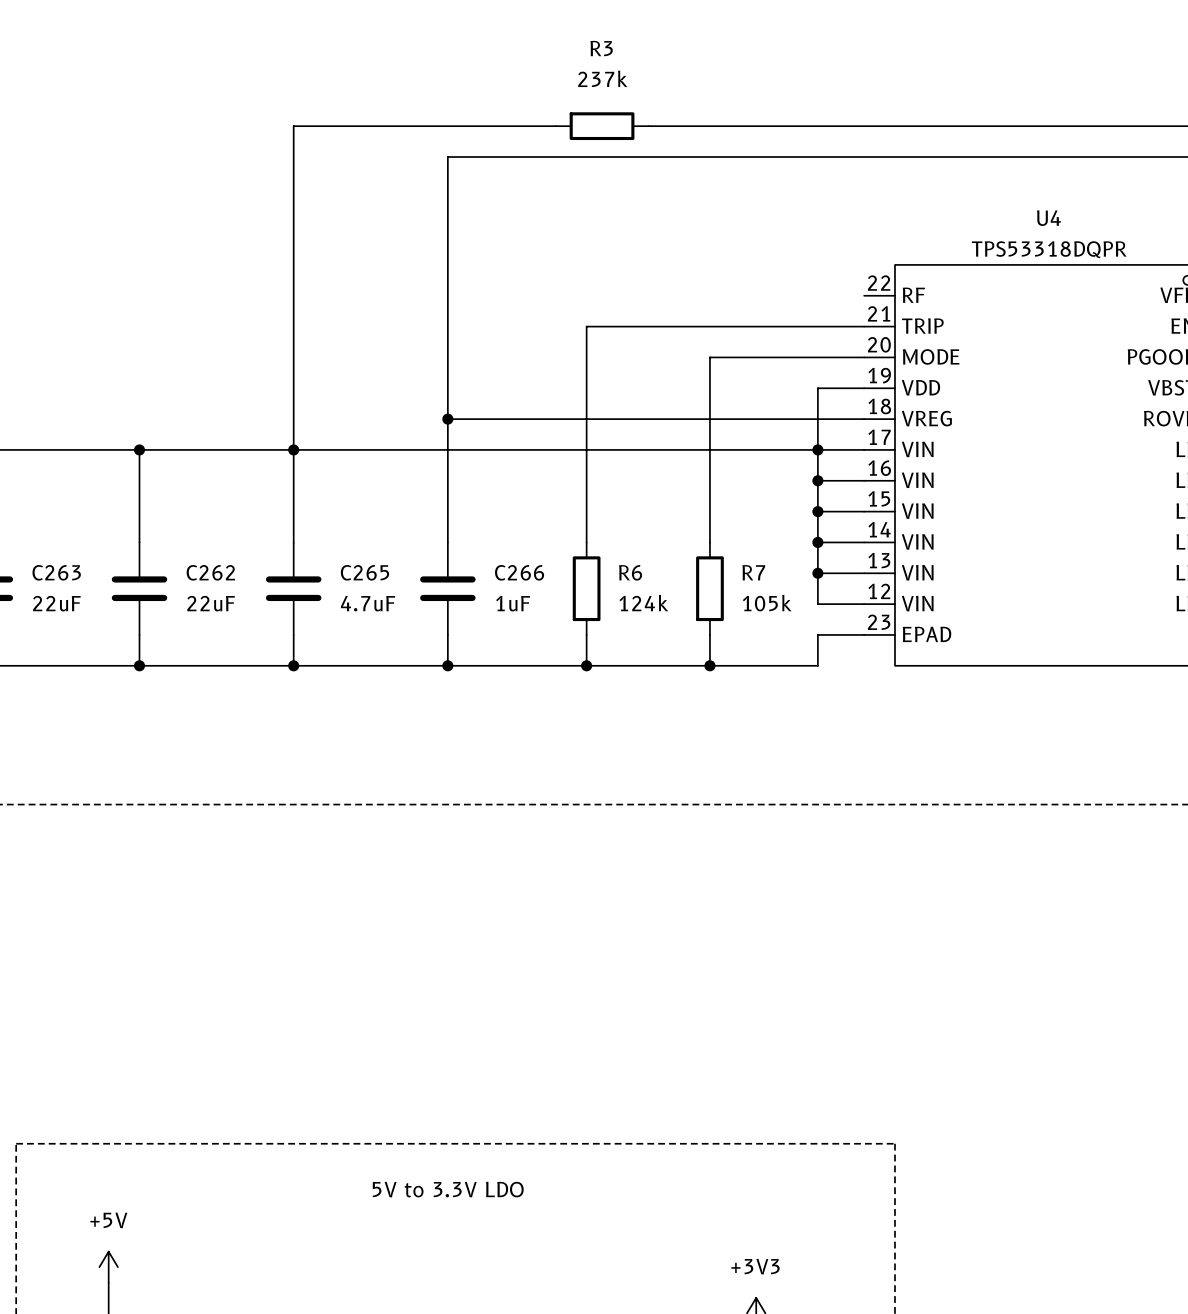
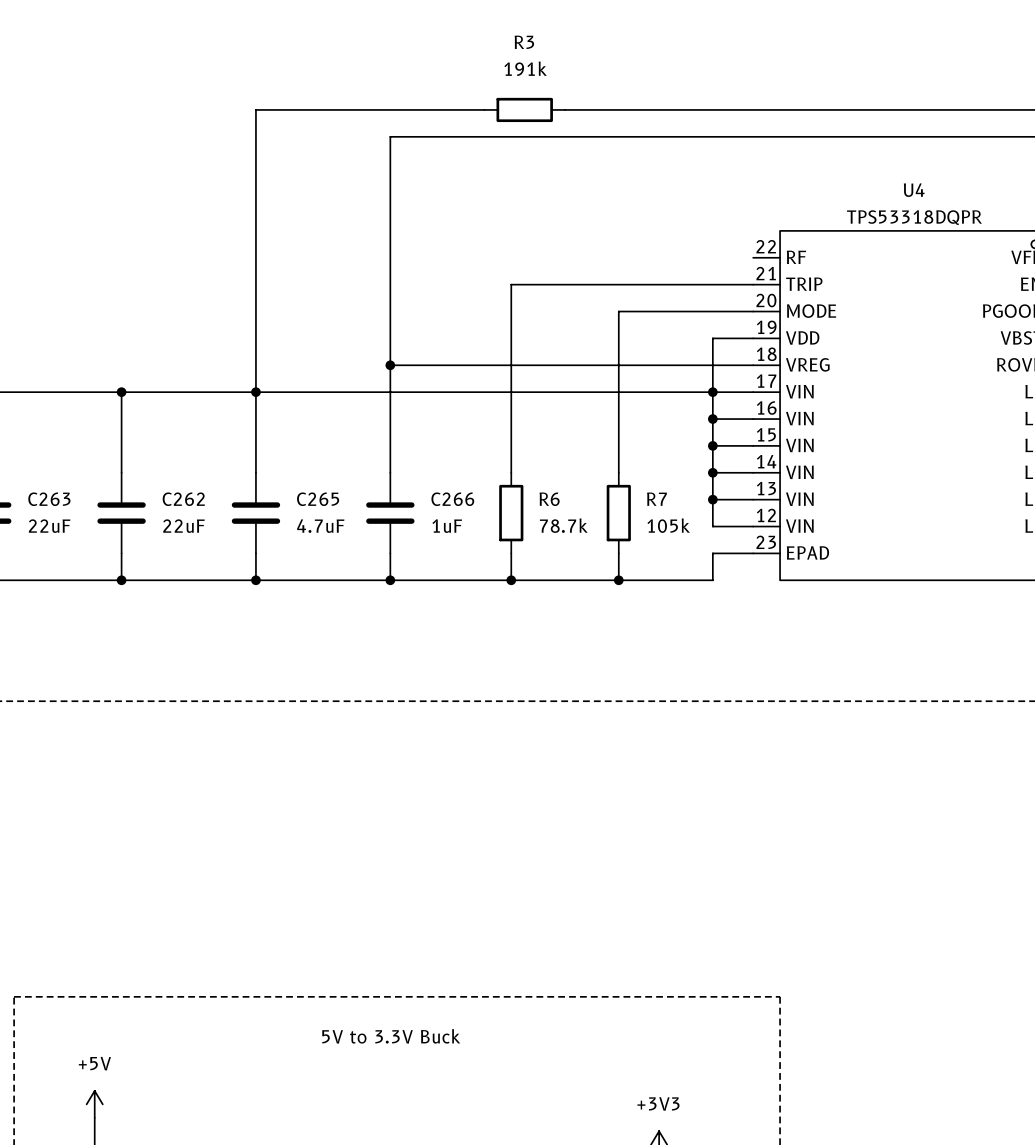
R3 value: 237k (602, 78) -> 191k (525, 68)
R6 value: 124k (643, 603) -> 78.7k (563, 525)
text: 5V to 3.3V LDO (448, 1189) -> 5V to 3.3V Buck (391, 1036)

